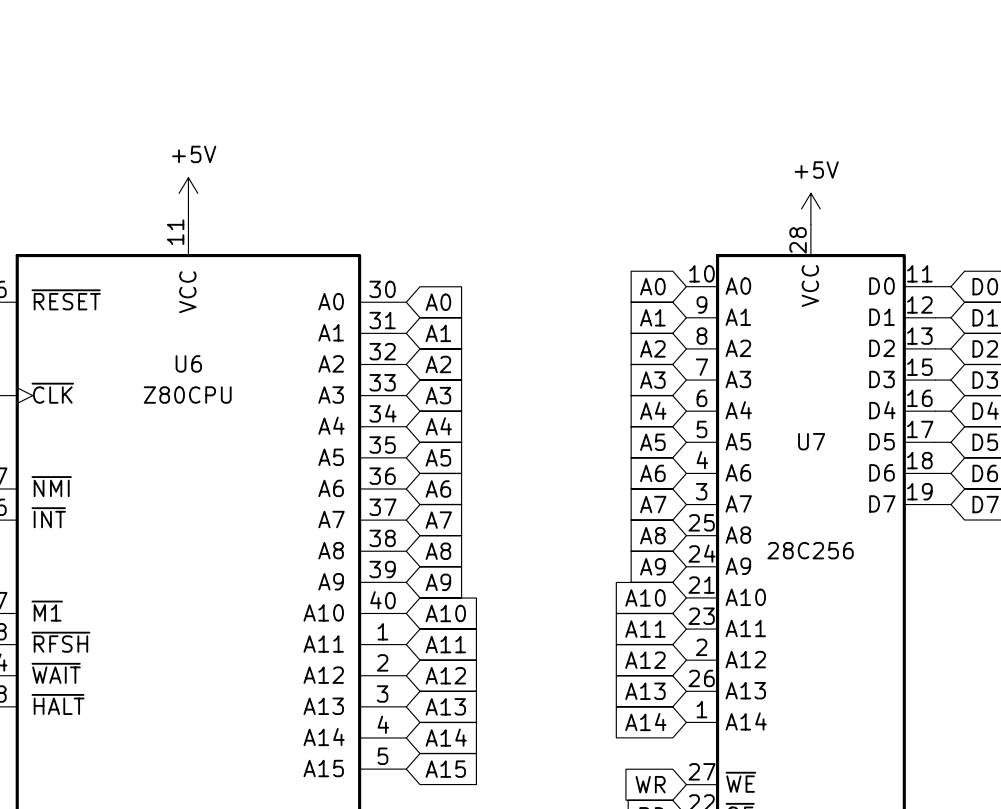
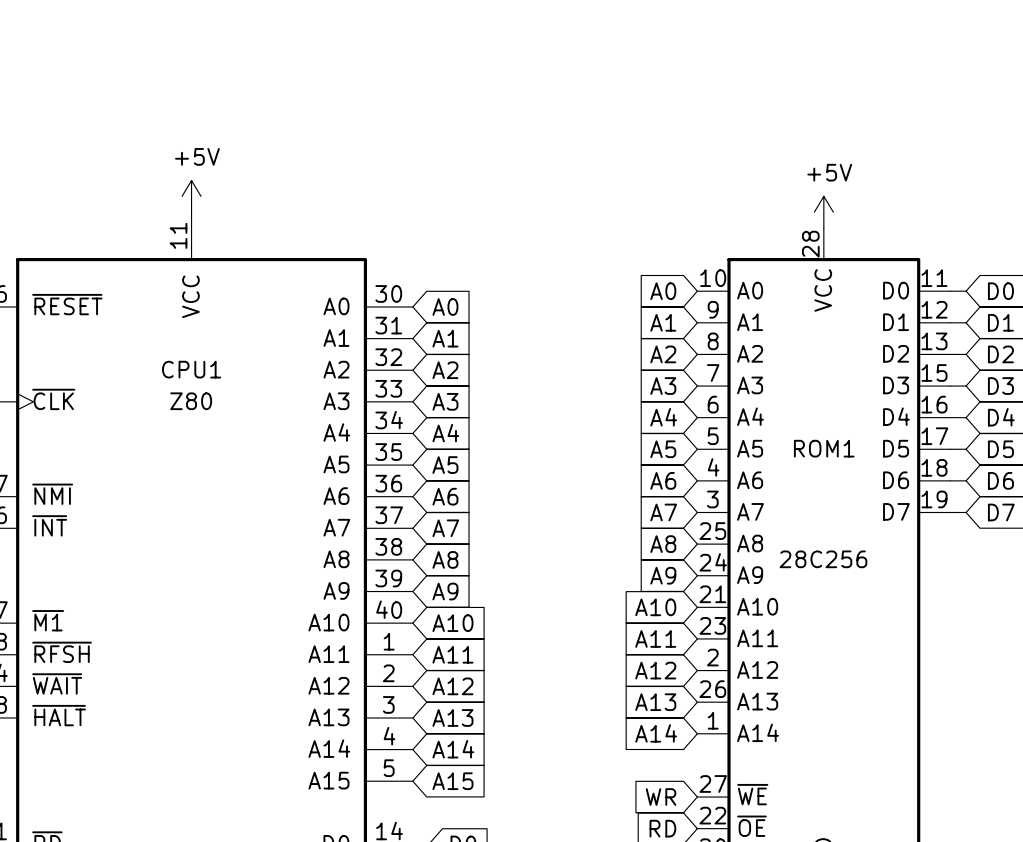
U6 name: U6 (188, 363) -> CPU1 (191, 369)
U6 value: Z80CPU (187, 395) -> Z80 (191, 401)
U7 name: U7 (811, 441) -> ROM1 (824, 448)

